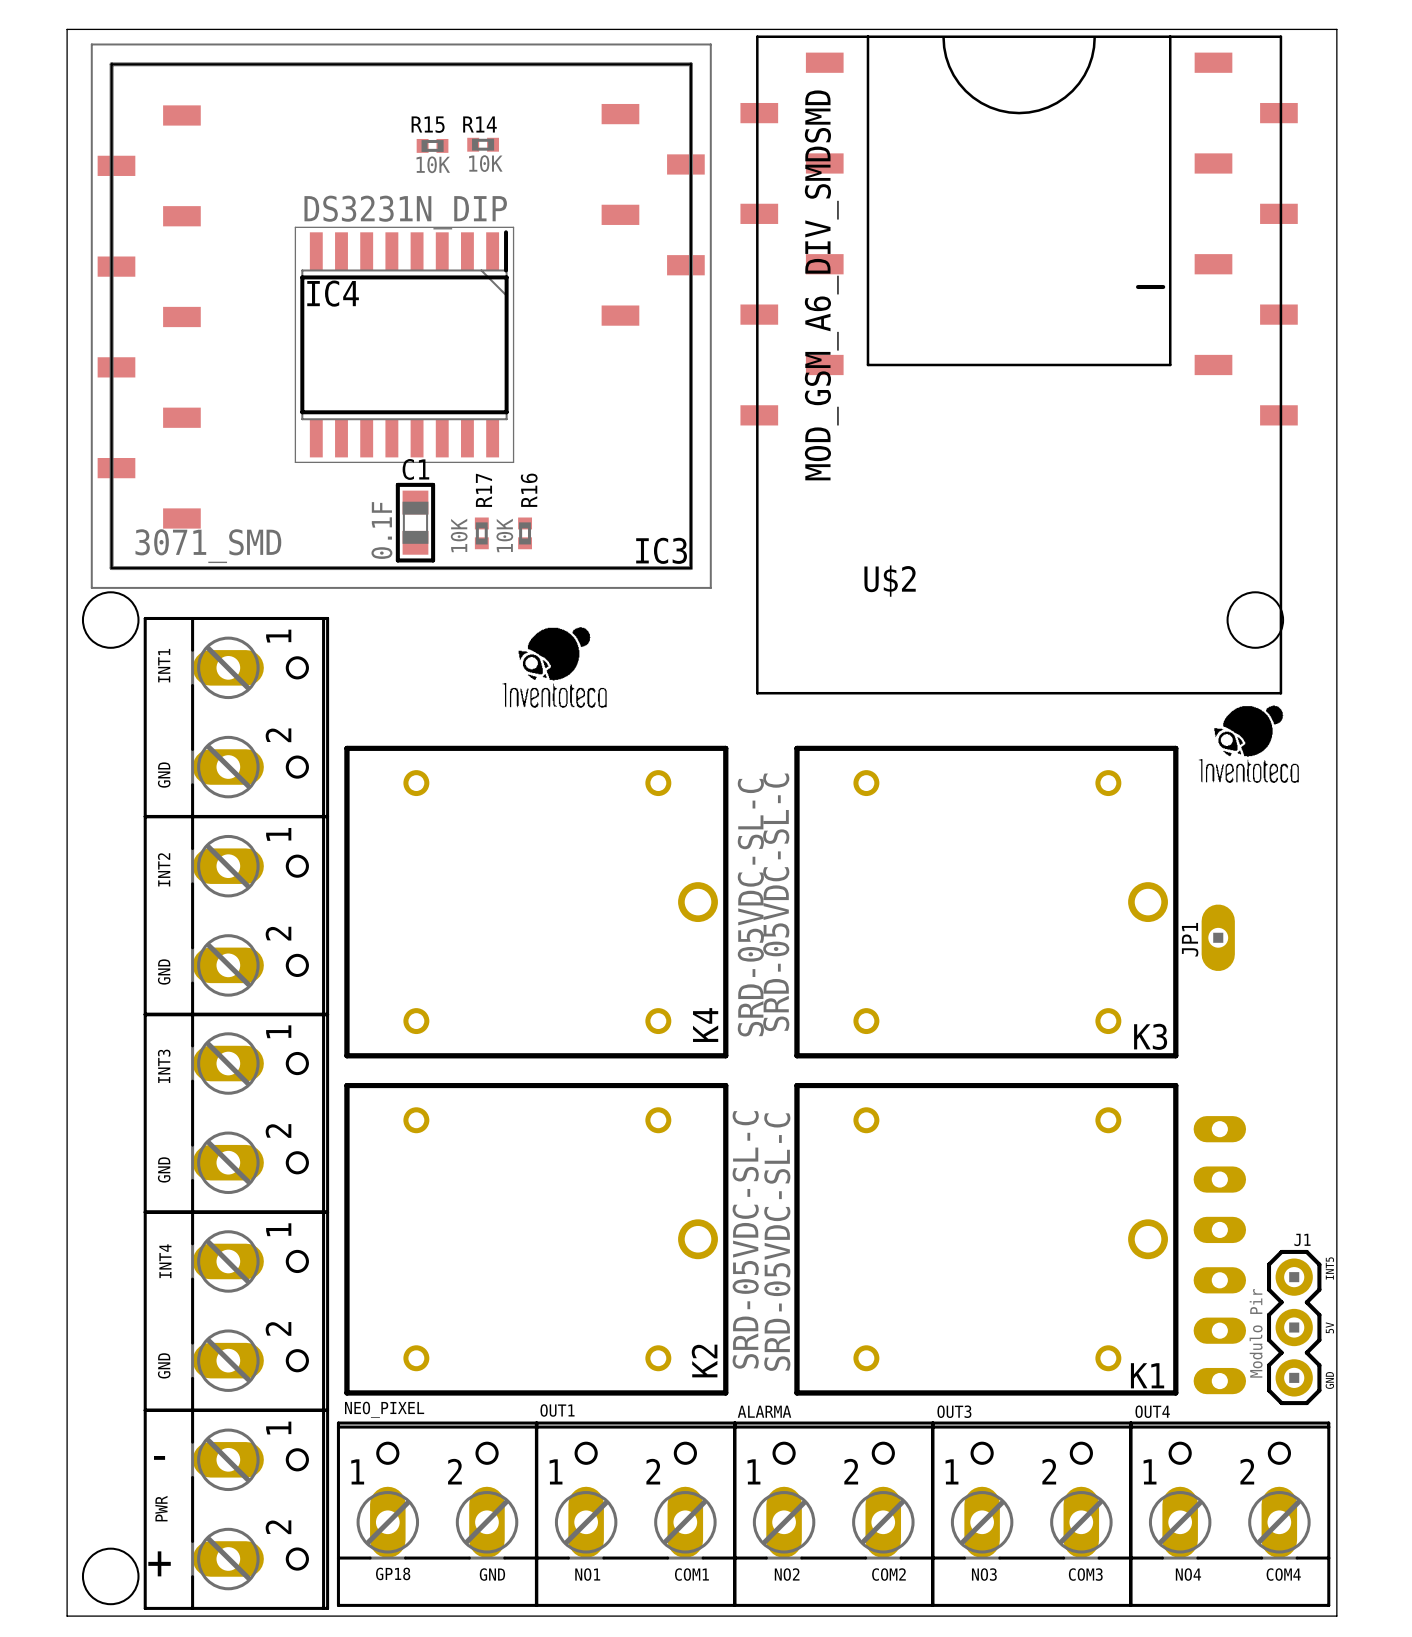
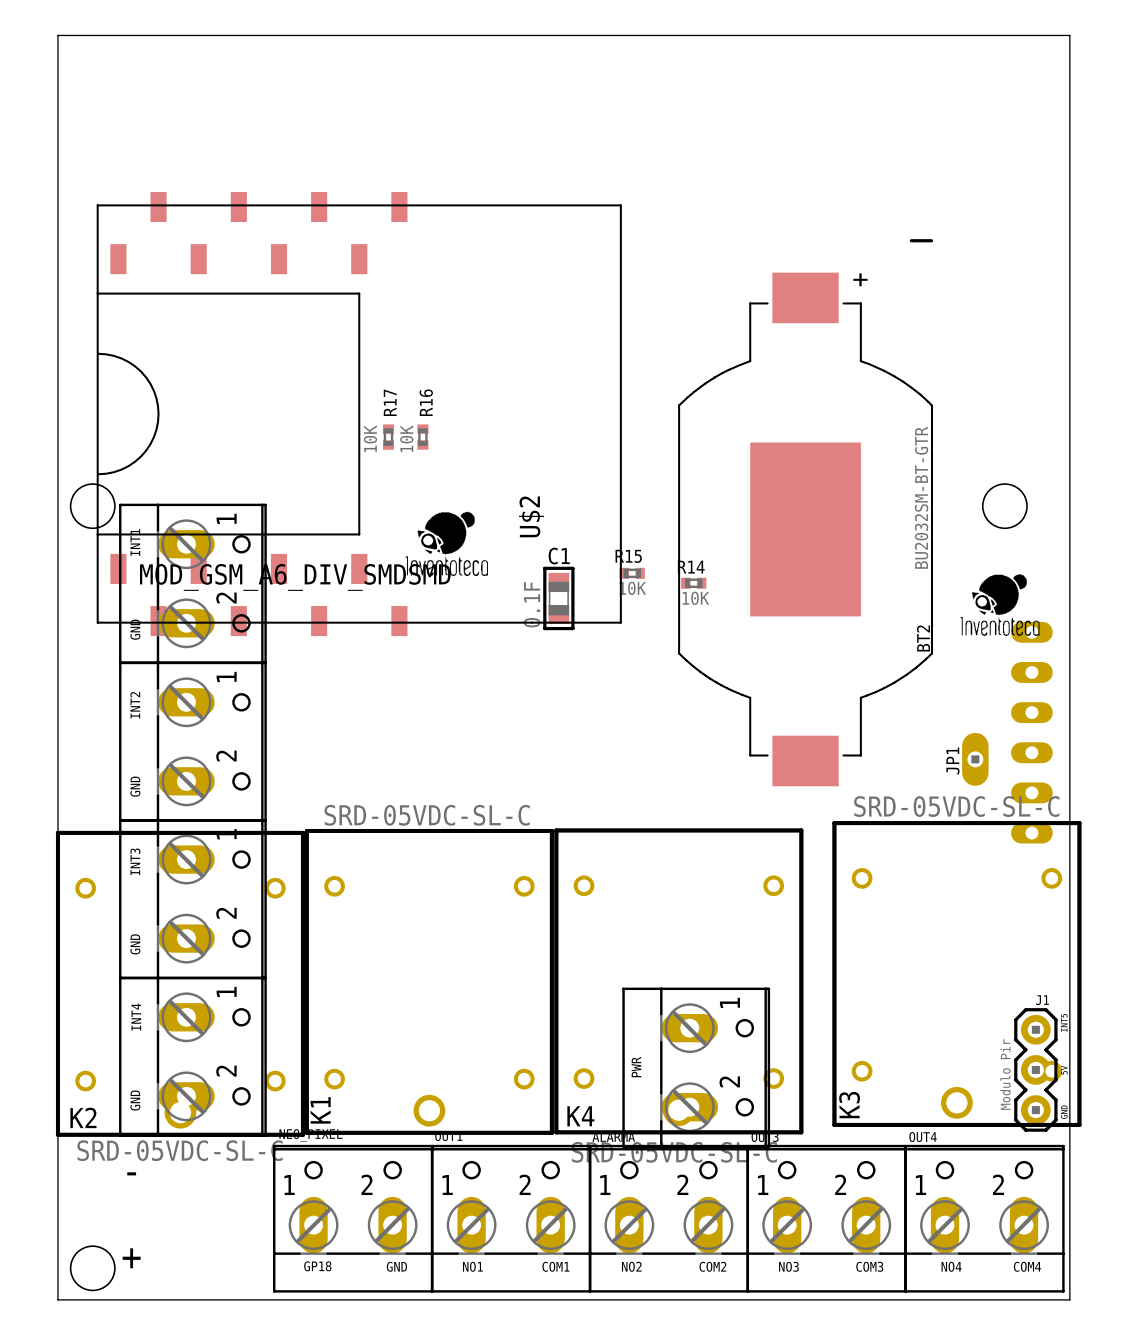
R14 position: (483, 144) -> (693, 583)
R15 position: (432, 145) -> (632, 573)
IC4: 3071_SMD (401, 316) -> none
IC3: DS3231N_DIP (404, 344) -> none
U$2 rotation: 0° (1019, 364) -> 90° counterclockwise (359, 414)
U$2 position: (1019, 364) -> (359, 414)
C1 position: (415, 522) -> (558, 598)
BT2: none -> BU2032SM-BT-GTR (805, 529)
K4 rotation: 0° (536, 902) -> 90° clockwise (678, 981)
K4 position: (536, 902) -> (678, 981)
K3 rotation: 0° (986, 902) -> 90° clockwise (956, 974)
K3 position: (986, 902) -> (956, 974)
K2 rotation: 0° (536, 1239) -> 90° clockwise (180, 983)
K2 position: (536, 1239) -> (180, 983)
K1 rotation: 0° (986, 1239) -> 90° clockwise (429, 981)
K1 position: (986, 1239) -> (429, 981)
part position: (1219, 1255) -> (1031, 732)
PWR: none -> (696, 1067)
PWR: (236, 1509) -> none

